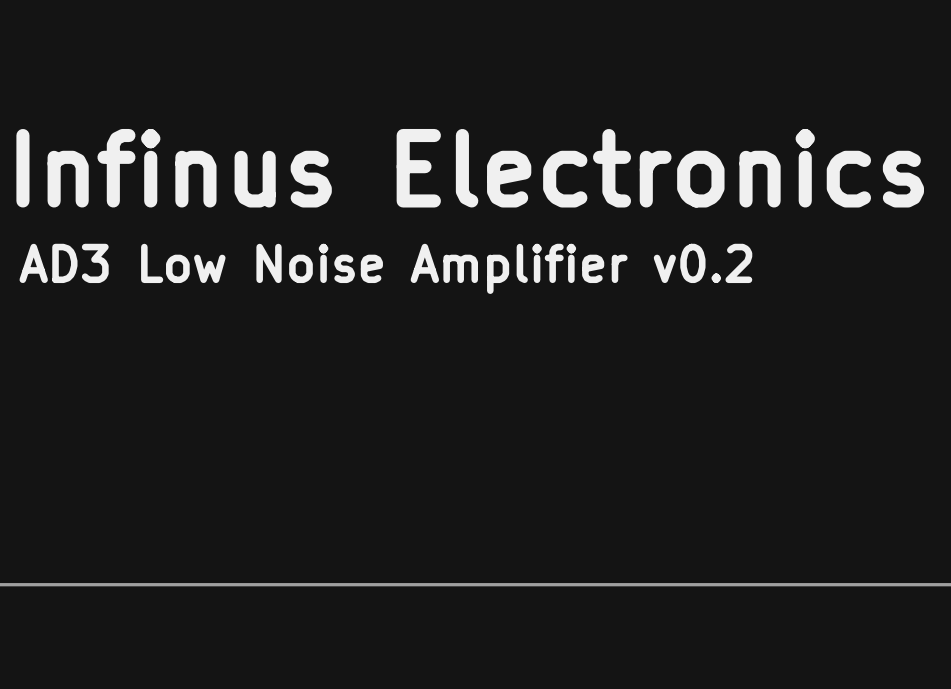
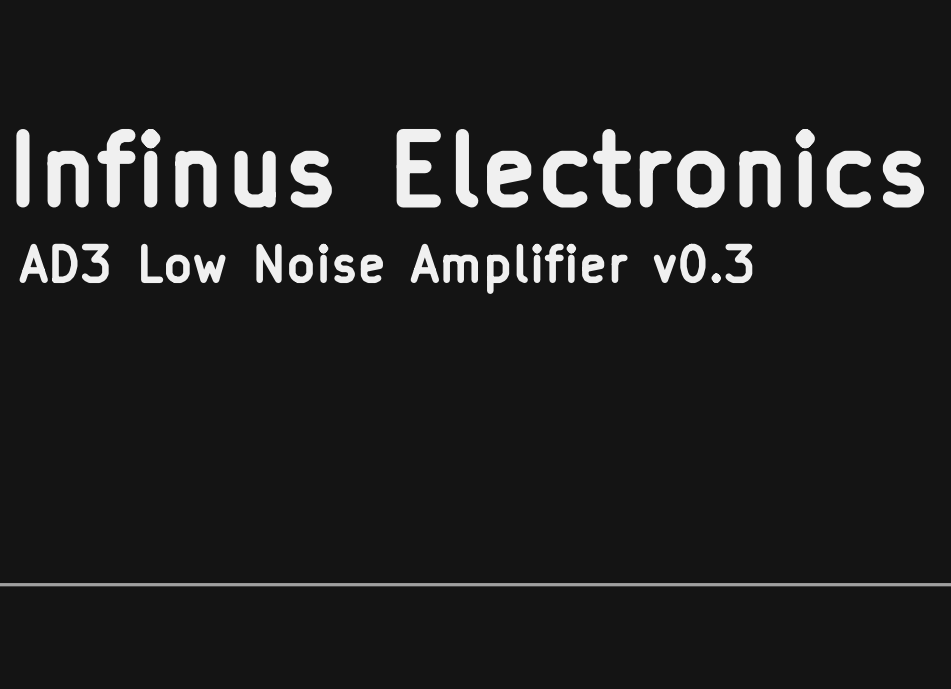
text: AD3 Low Noise Amplifier v0.2 (385, 268) -> AD3 Low Noise Amplifier v0.3 (385, 268)

